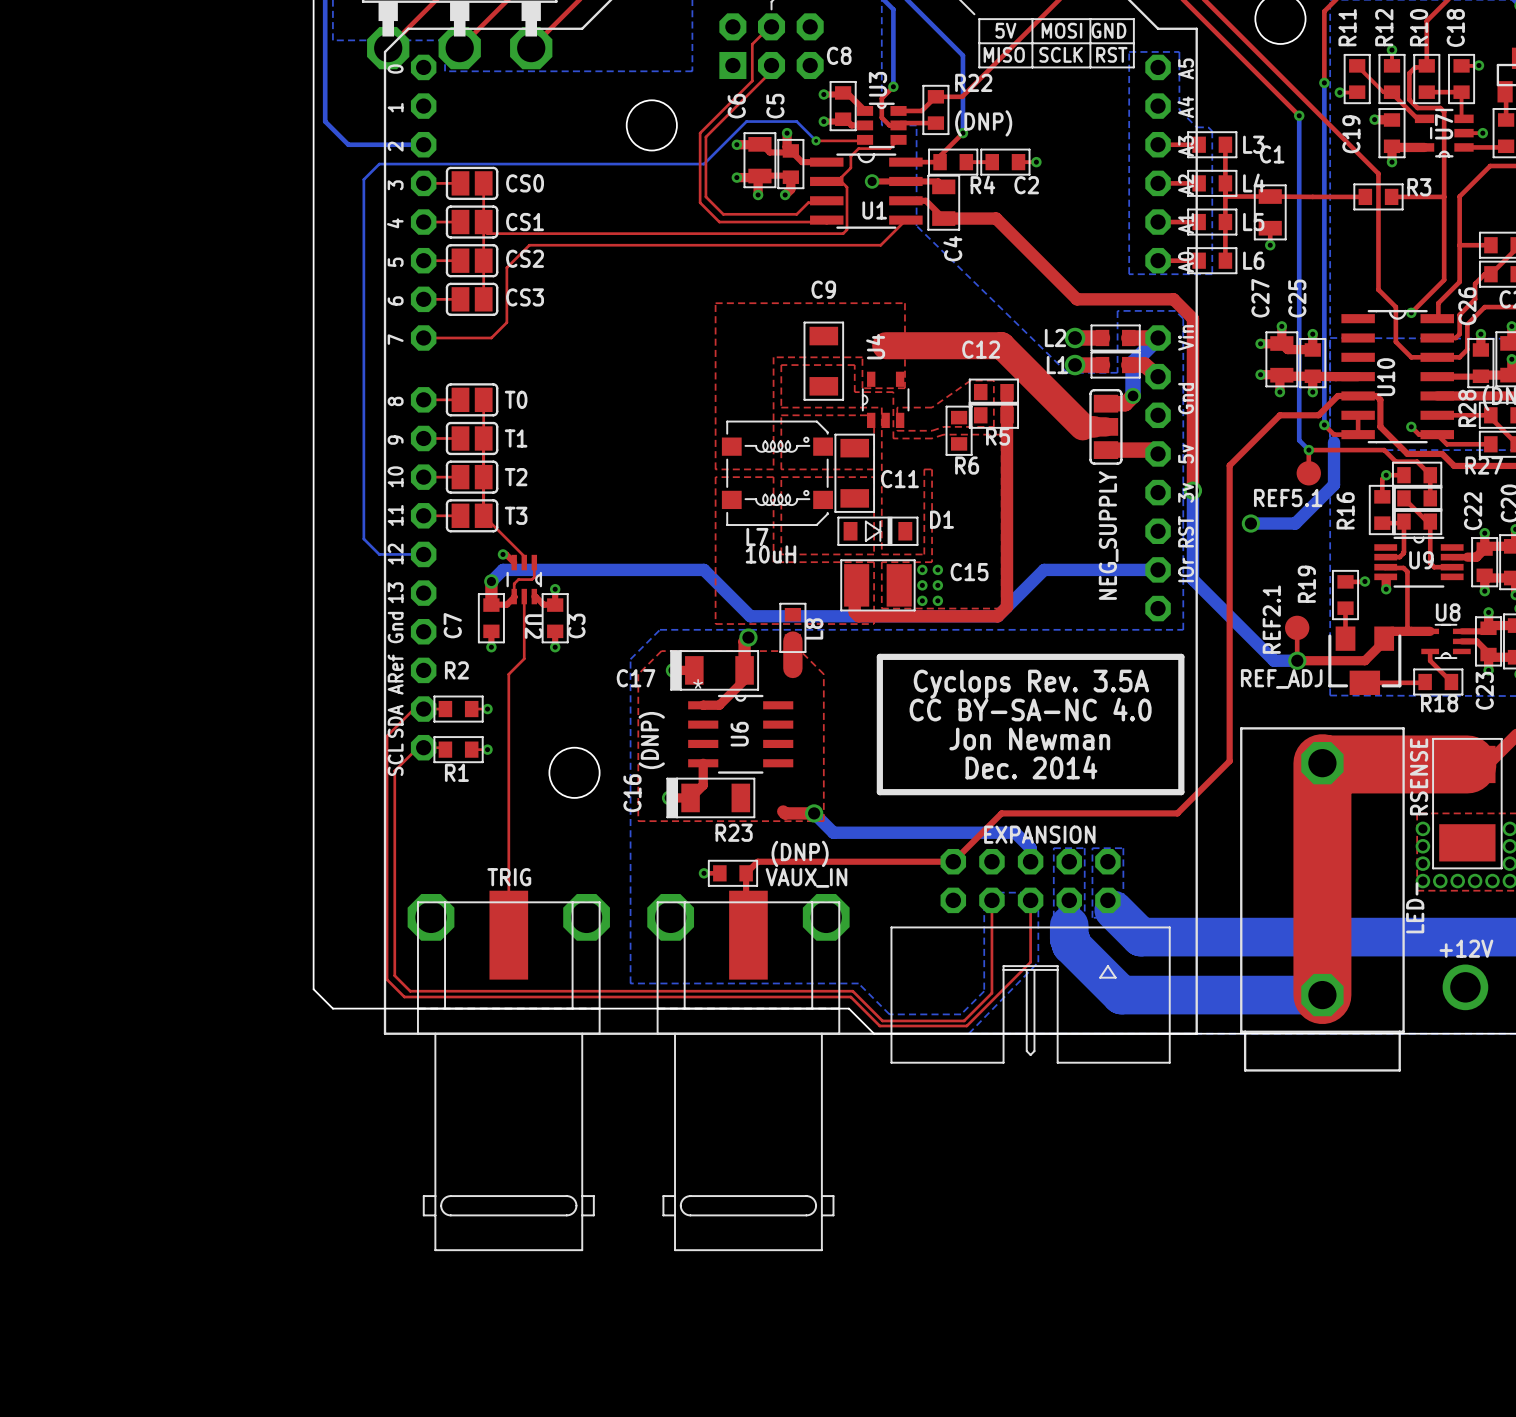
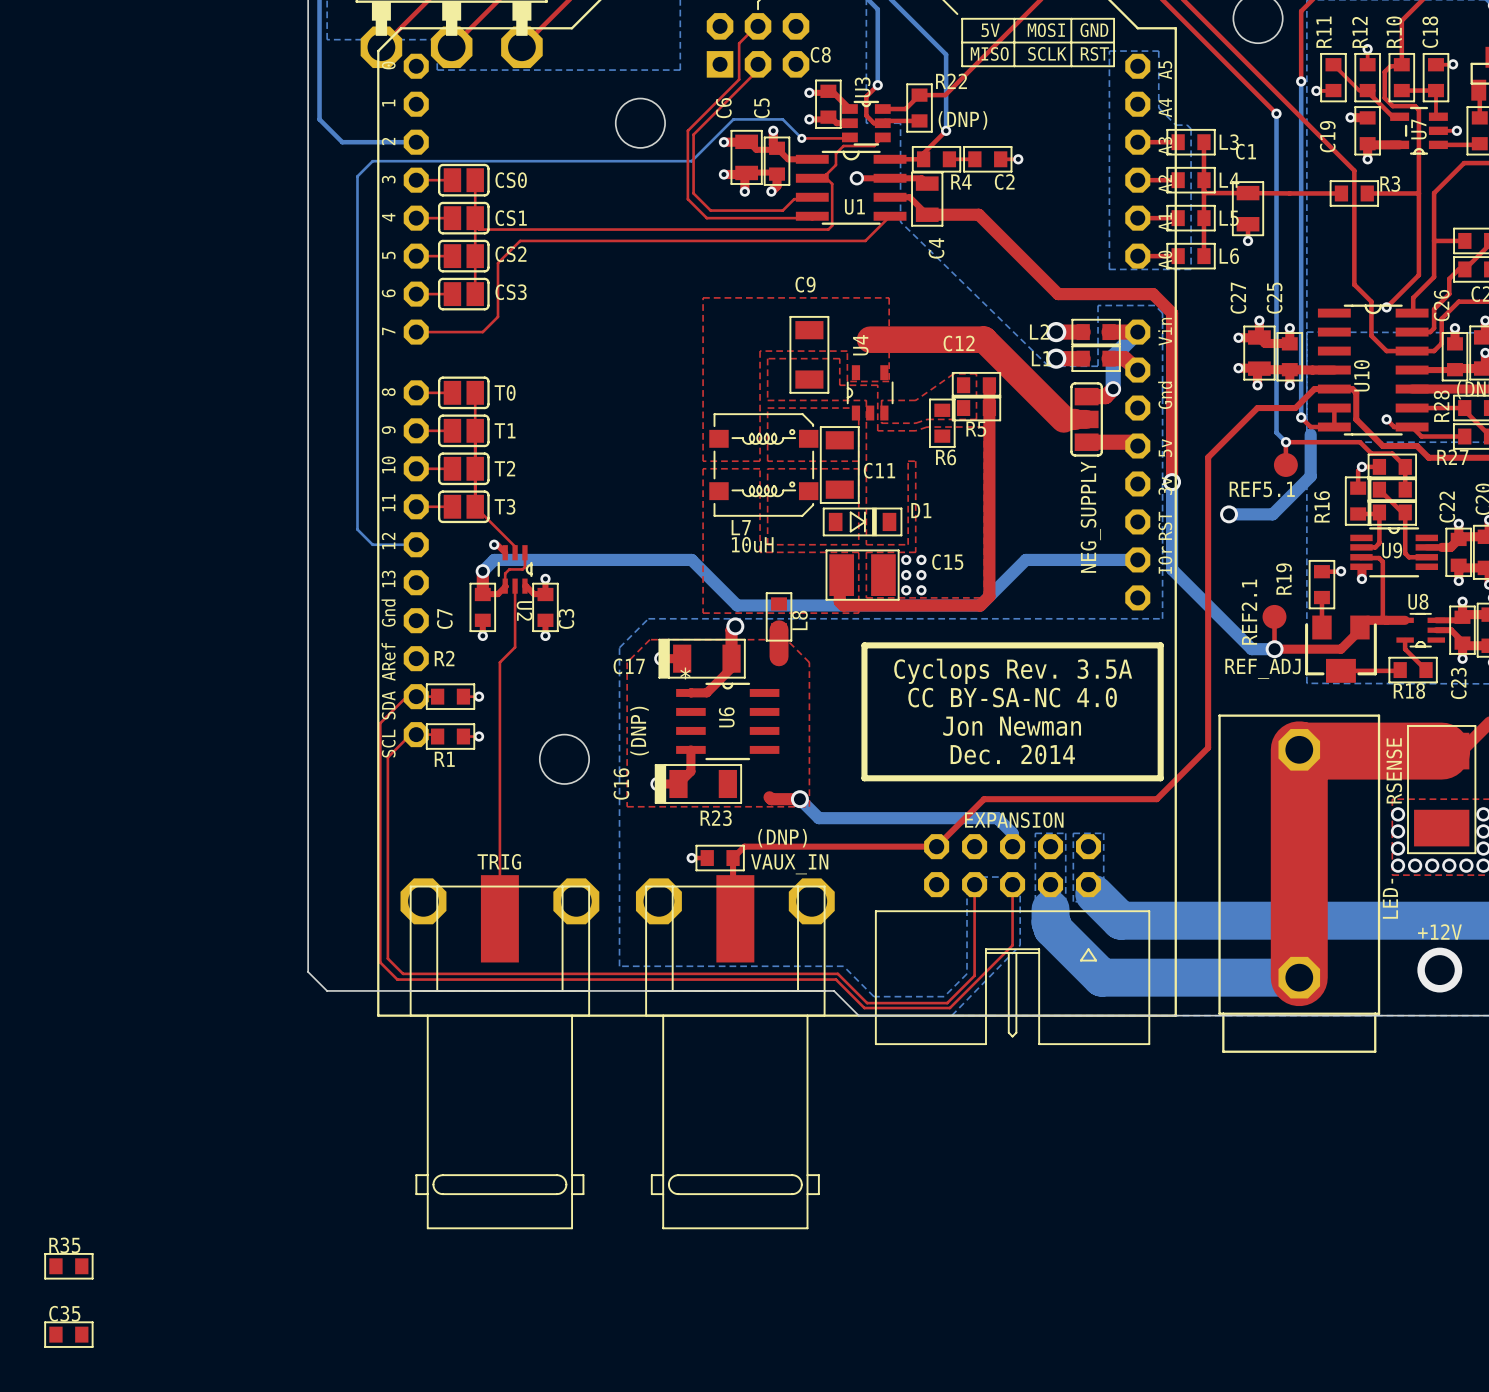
R35: none -> (68, 1266)
C35: none -> (68, 1334)

